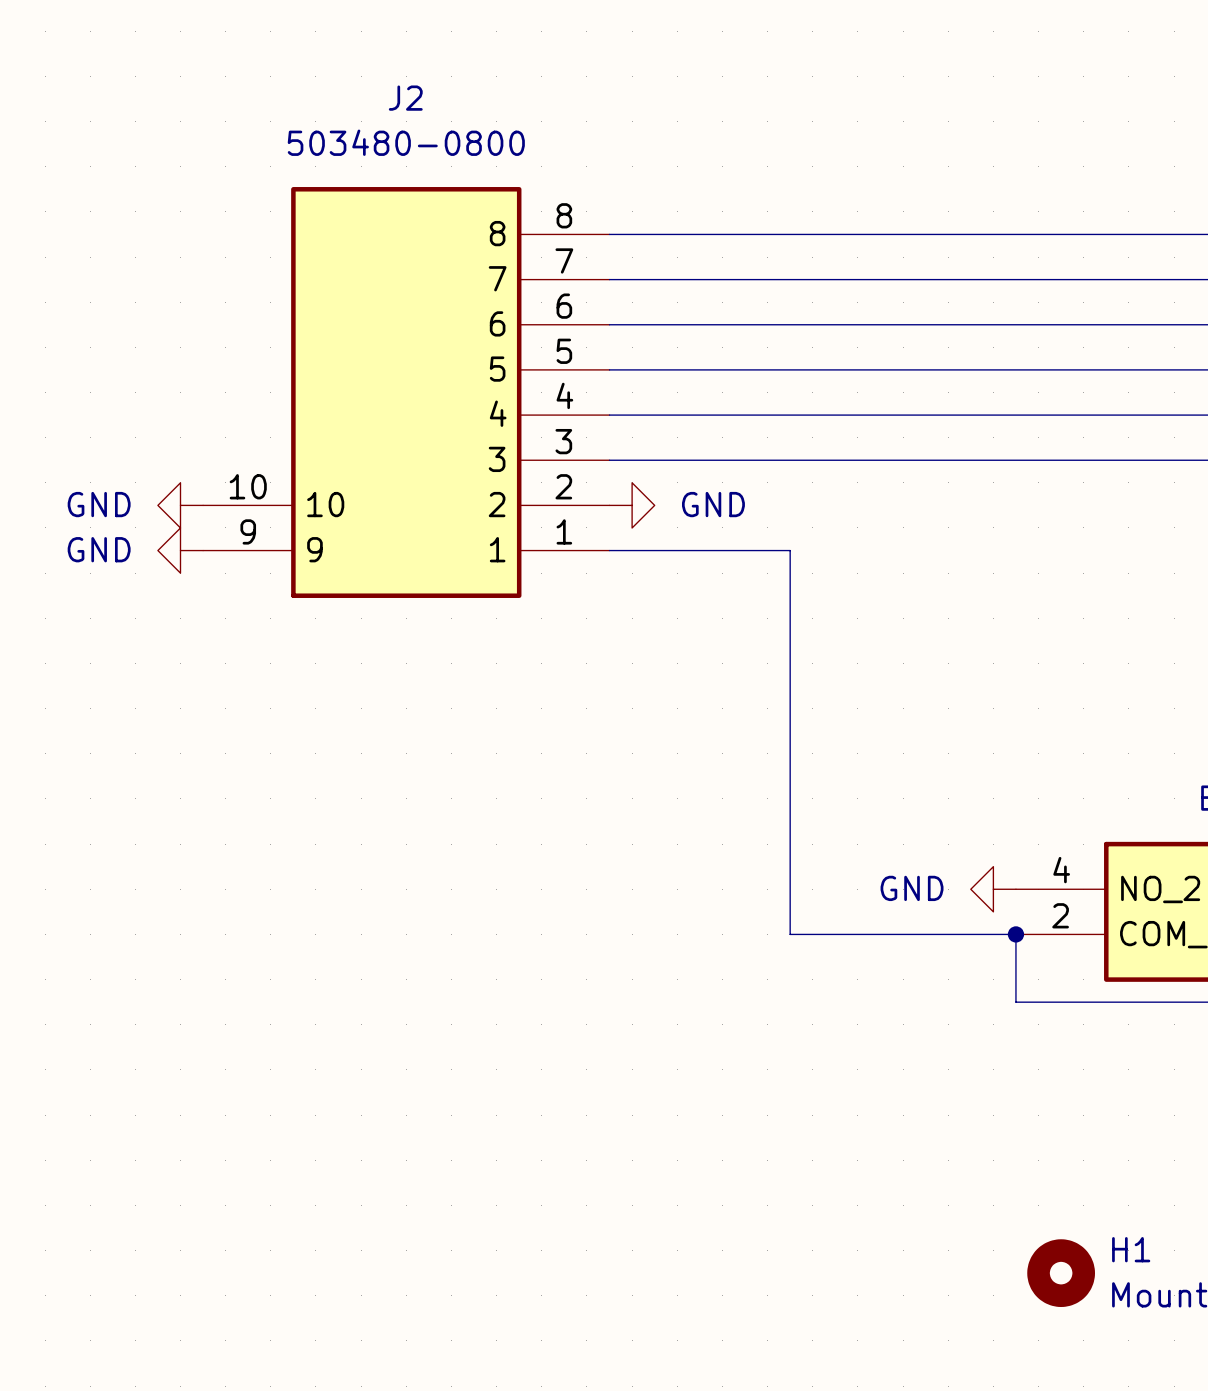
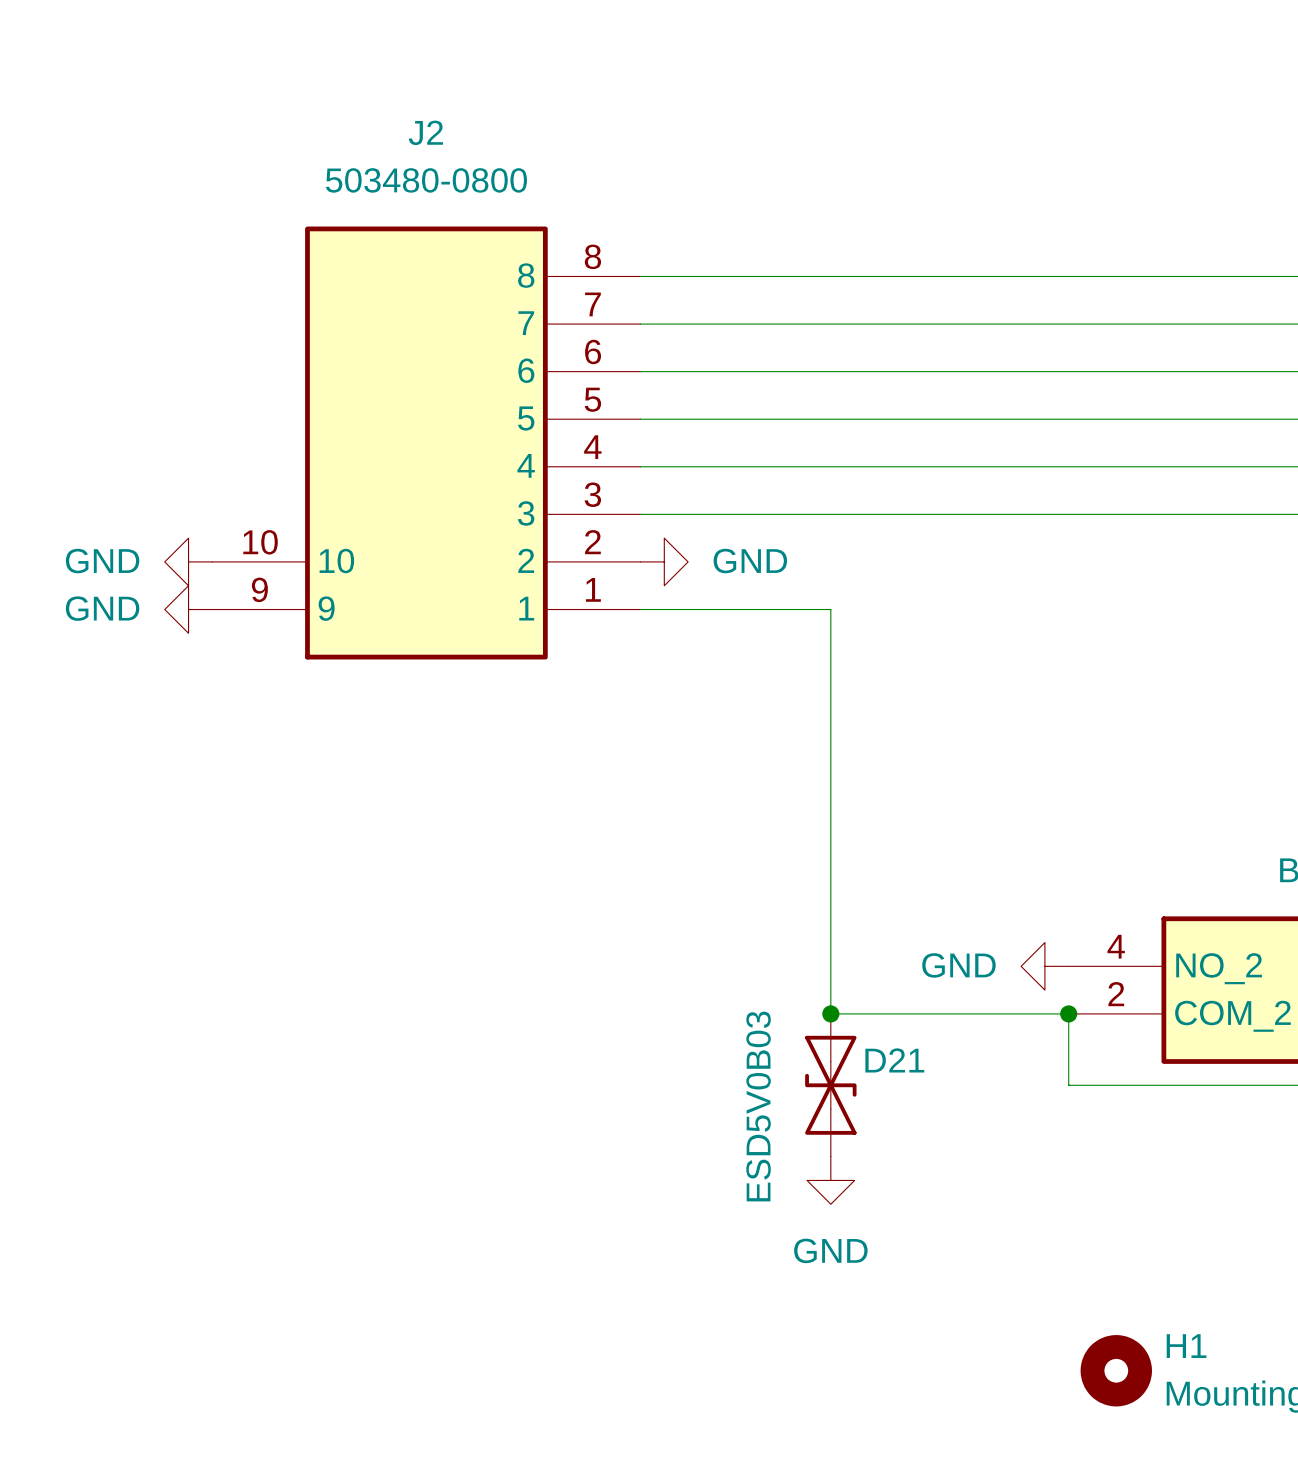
junction: none -> (830, 1013)
D21: none -> ESD5V0B03 (830, 1085)
power symbol: none -> GND (830, 1180)

